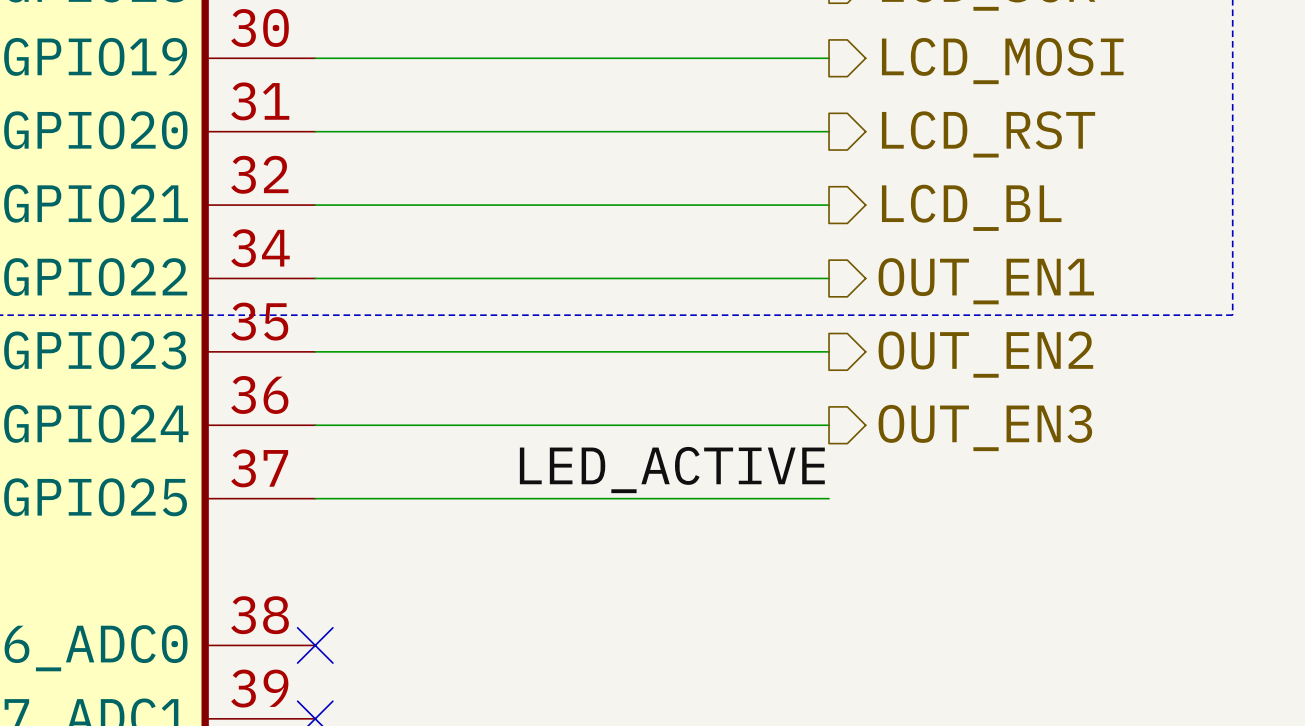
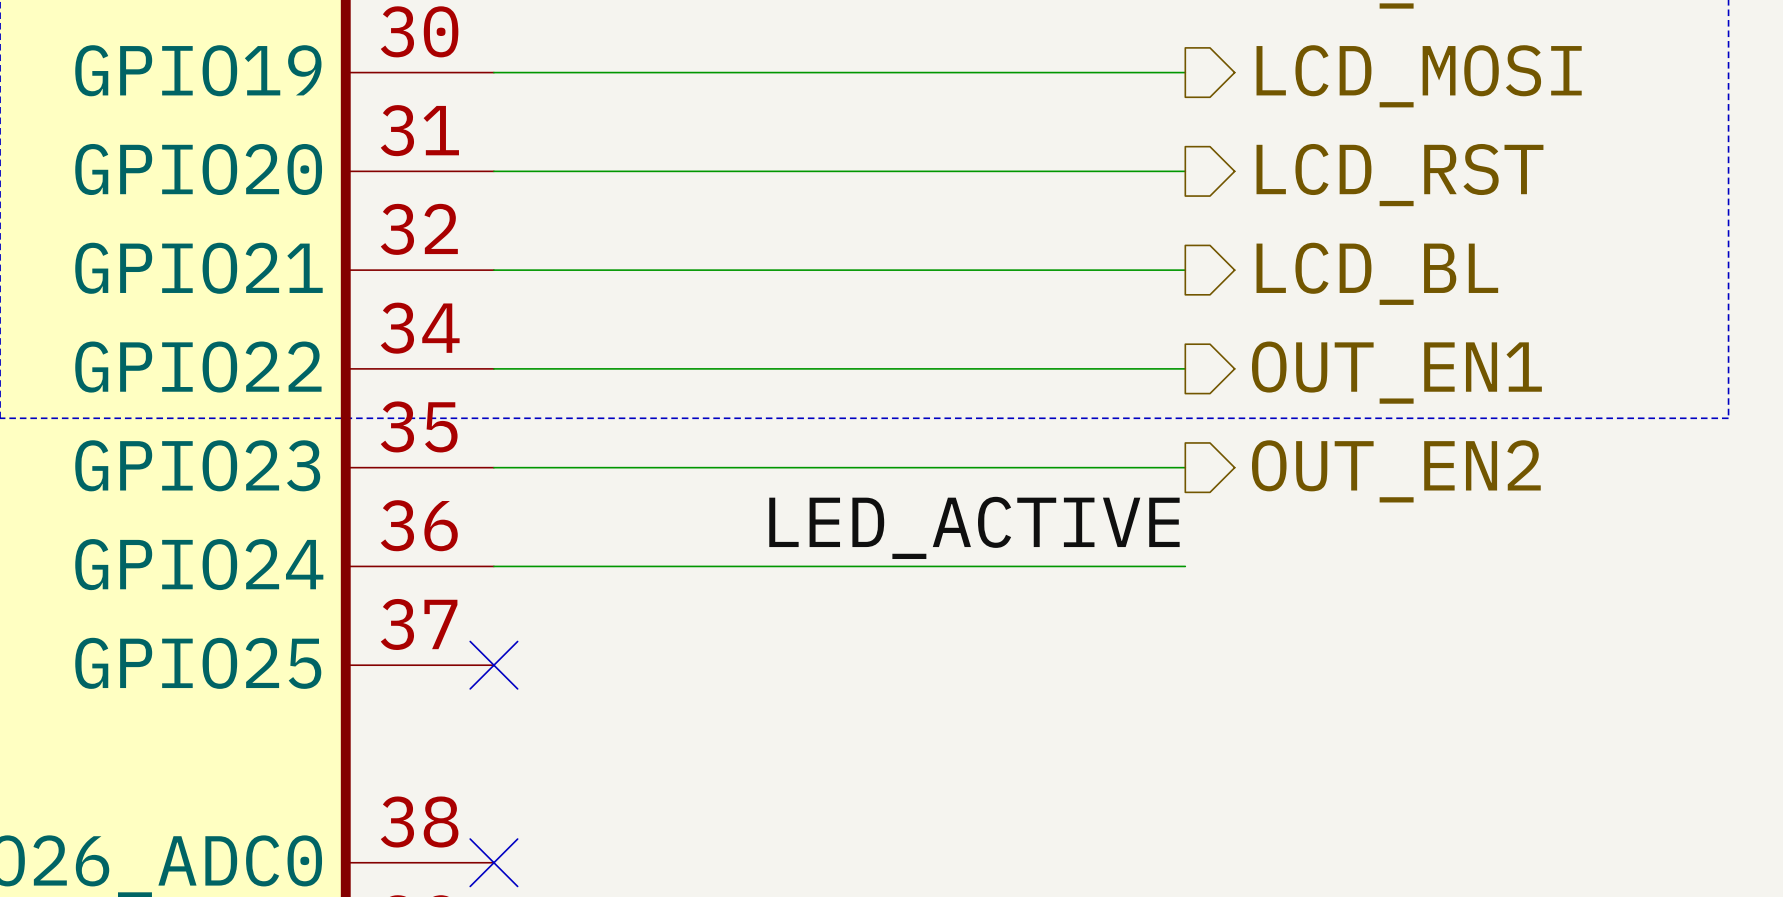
hierarchical label: OUT_EN3 (985, 428) -> none
label position: LED_ACTIVE (672, 470) -> LED_ACTIVE (974, 527)
wire: (315, 498) (829, 498) -> none
no-connect mark: none -> (493, 665)

